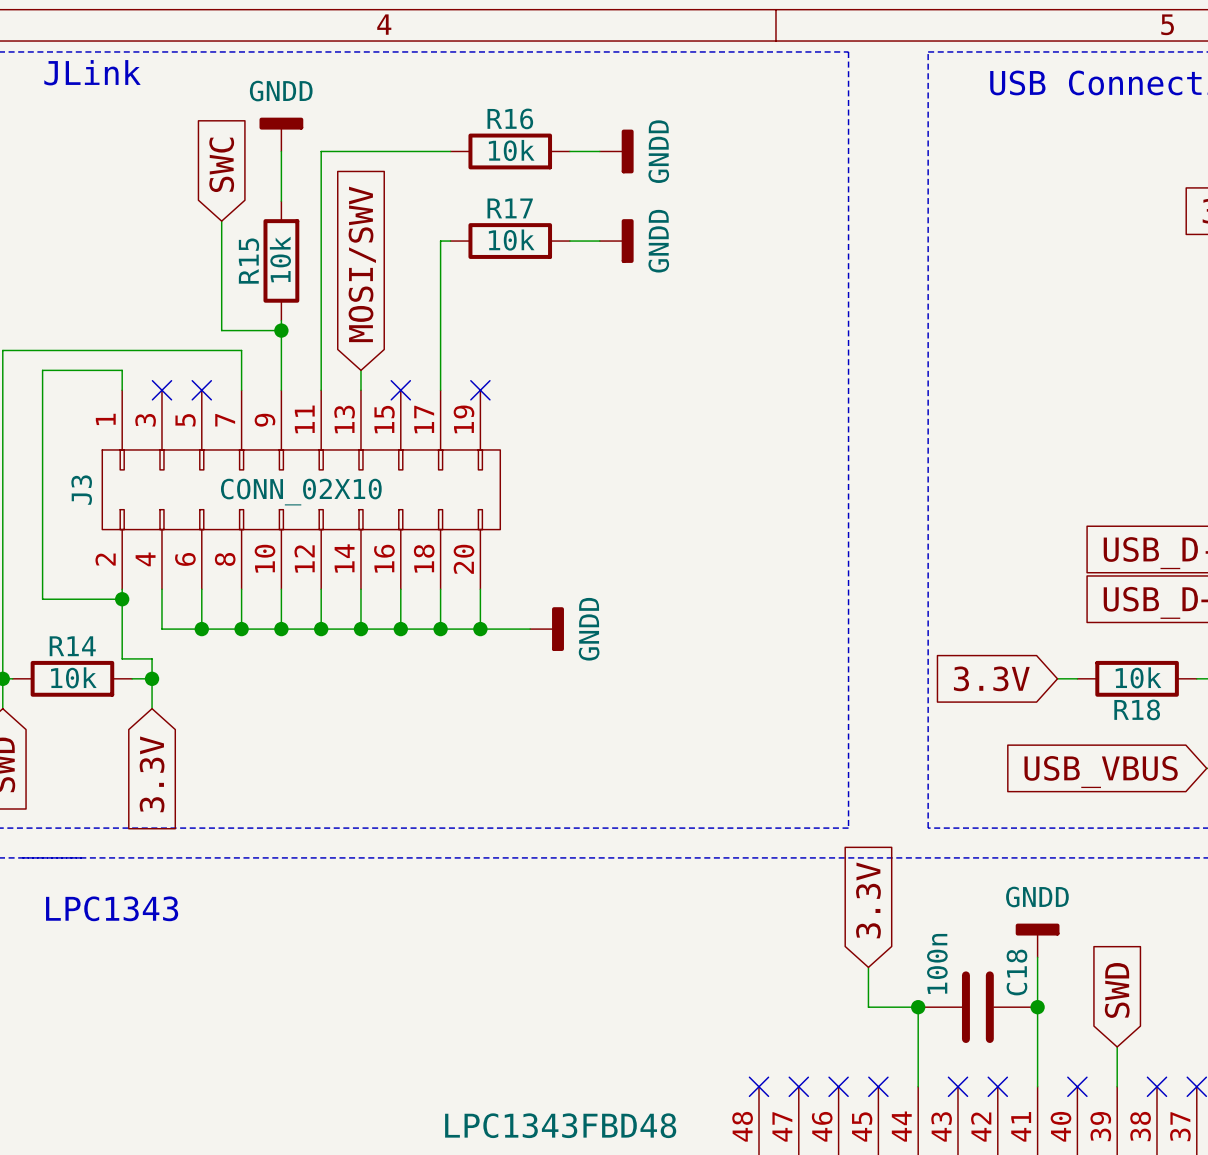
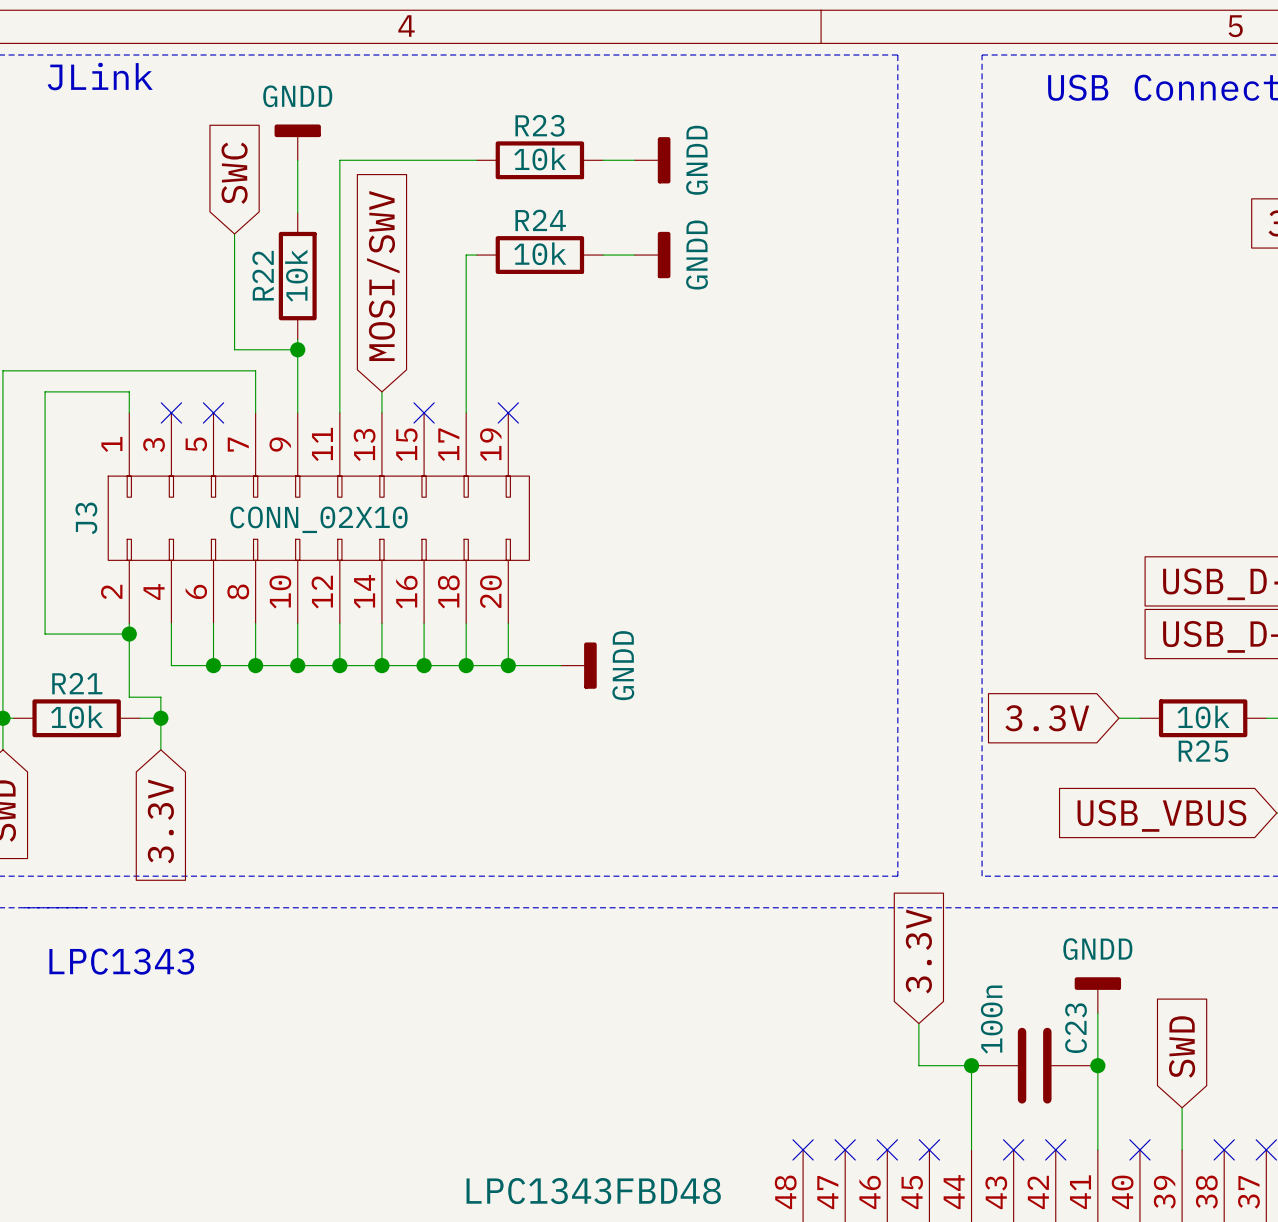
R16 name: R16 (510, 118) -> R23 (540, 125)
R17 name: R17 (510, 208) -> R24 (540, 220)
R15 name: R15 (249, 261) -> R22 (263, 275)
R14 name: R14 (72, 646) -> R21 (77, 683)
R18 name: R18 (1137, 709) -> R25 (1203, 751)
C18 name: C18 (1016, 972) -> C23 (1076, 1028)

